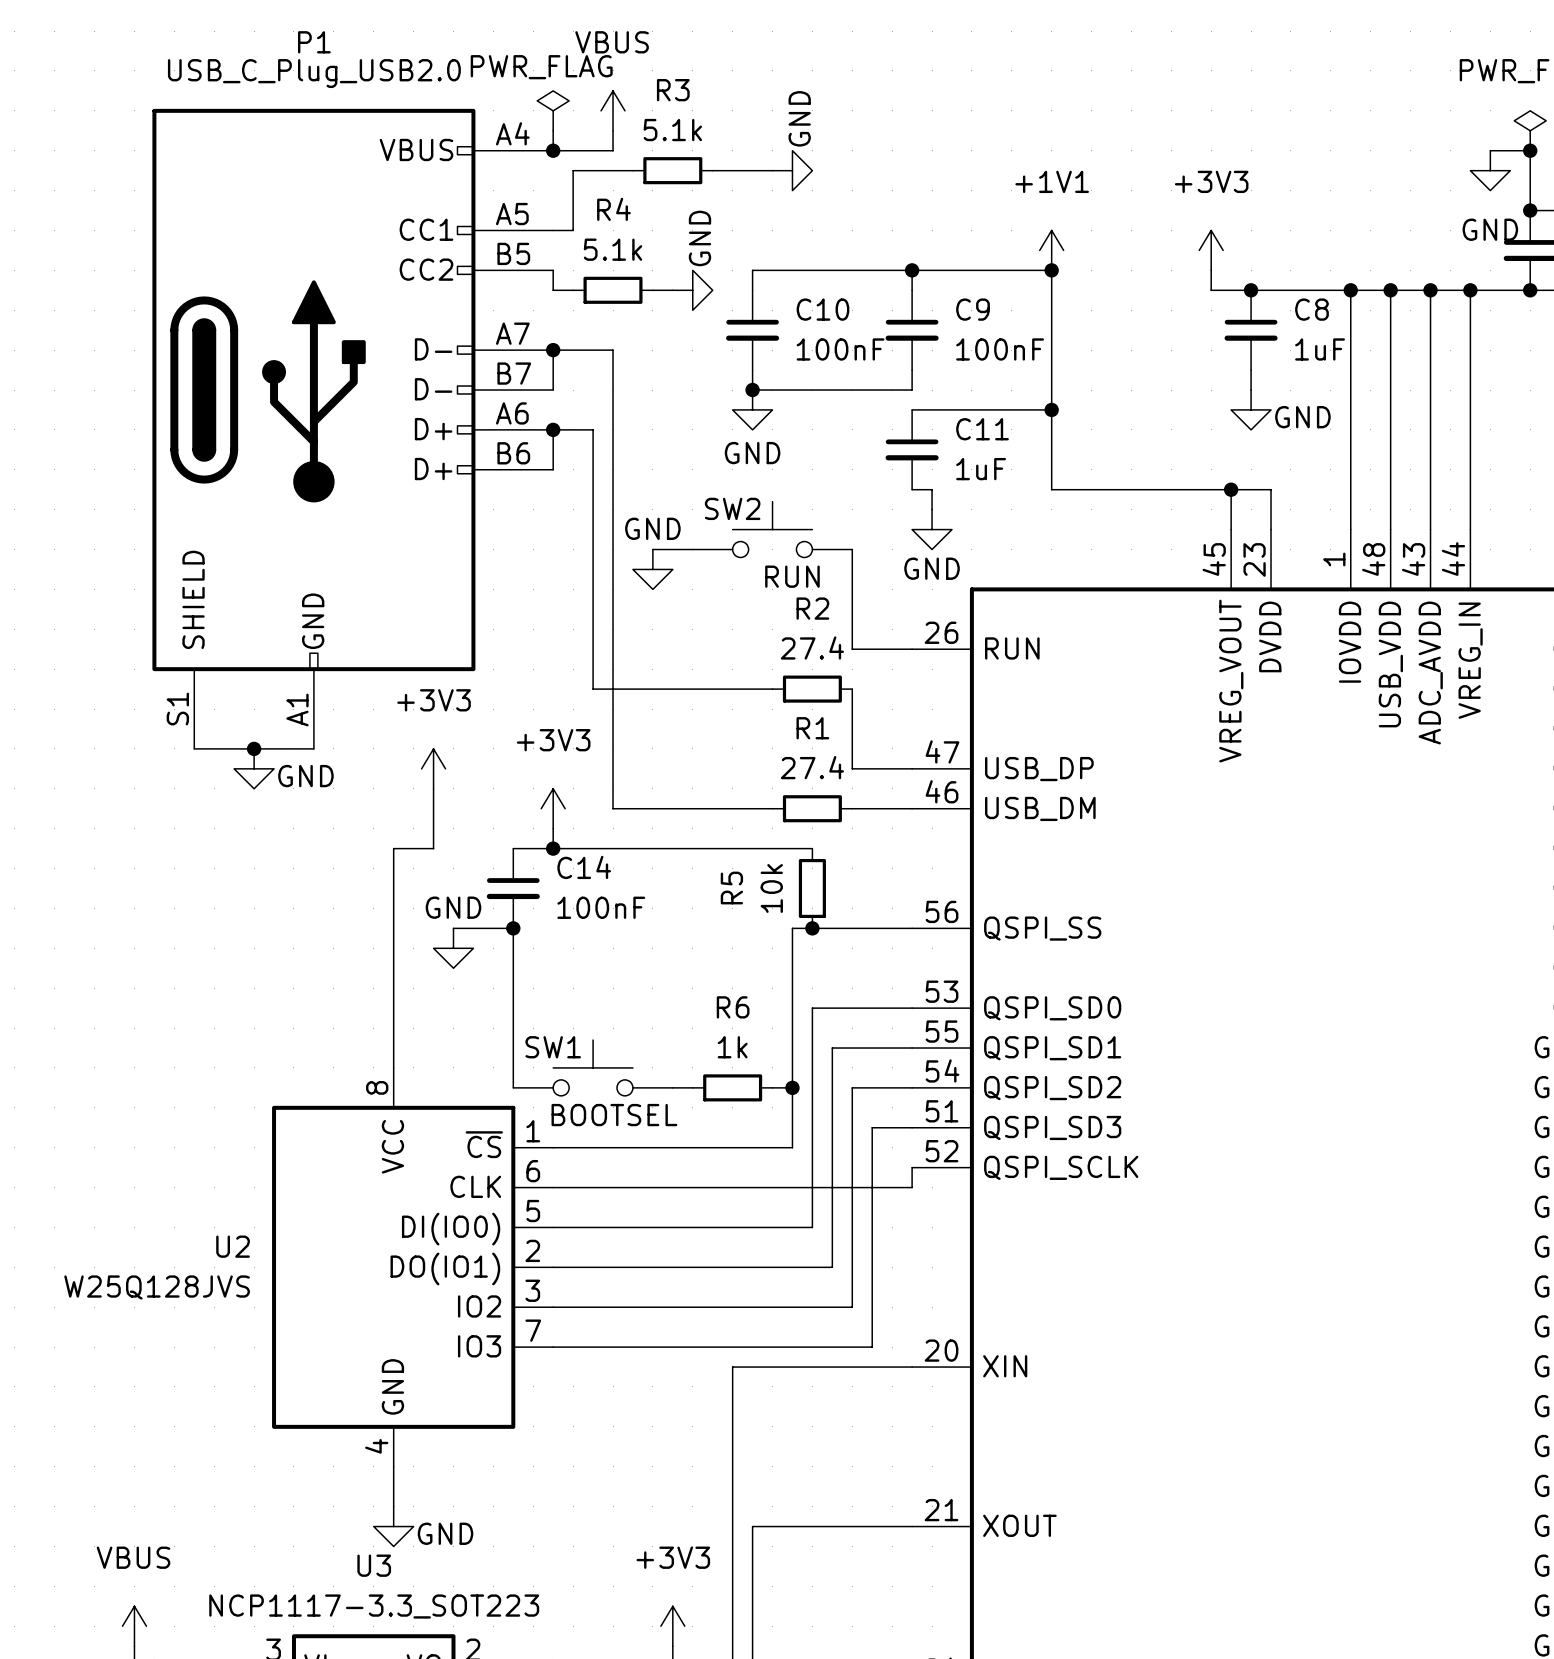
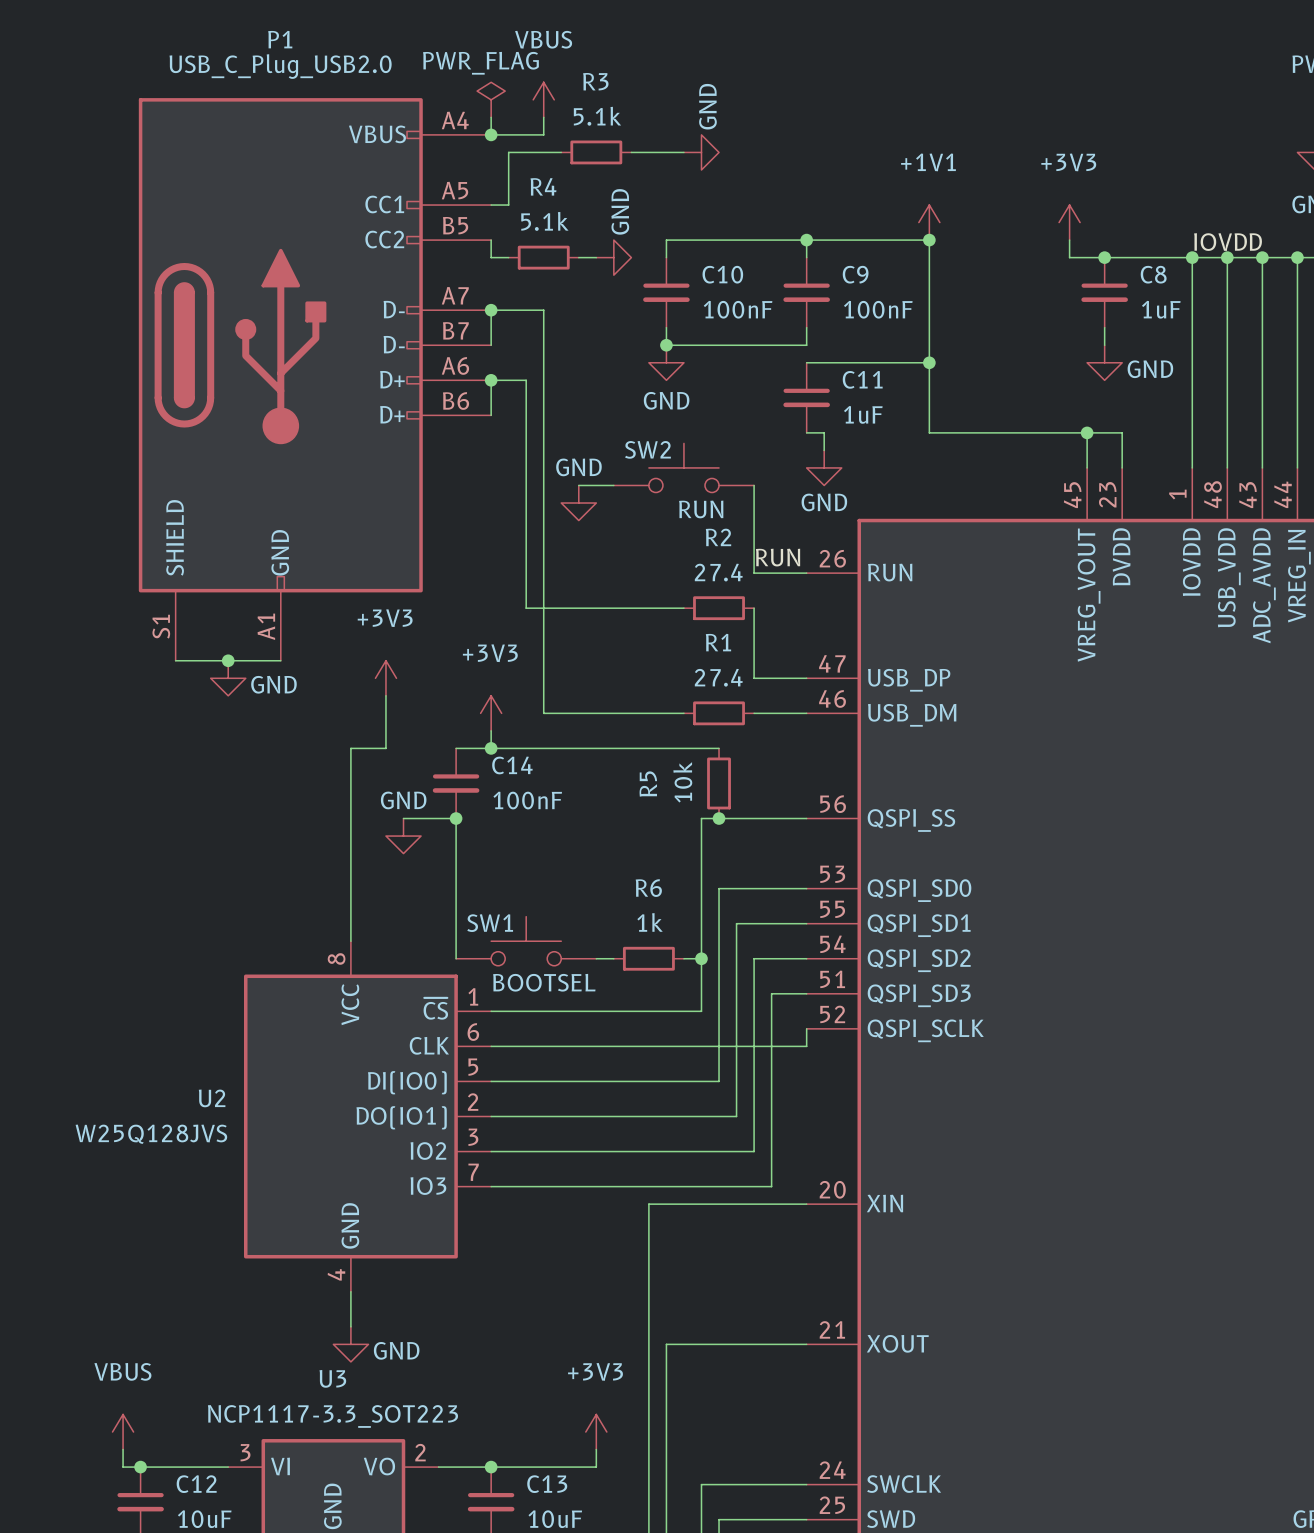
label: none -> IOVDD (1228, 242)
label: none -> RUN (778, 557)

